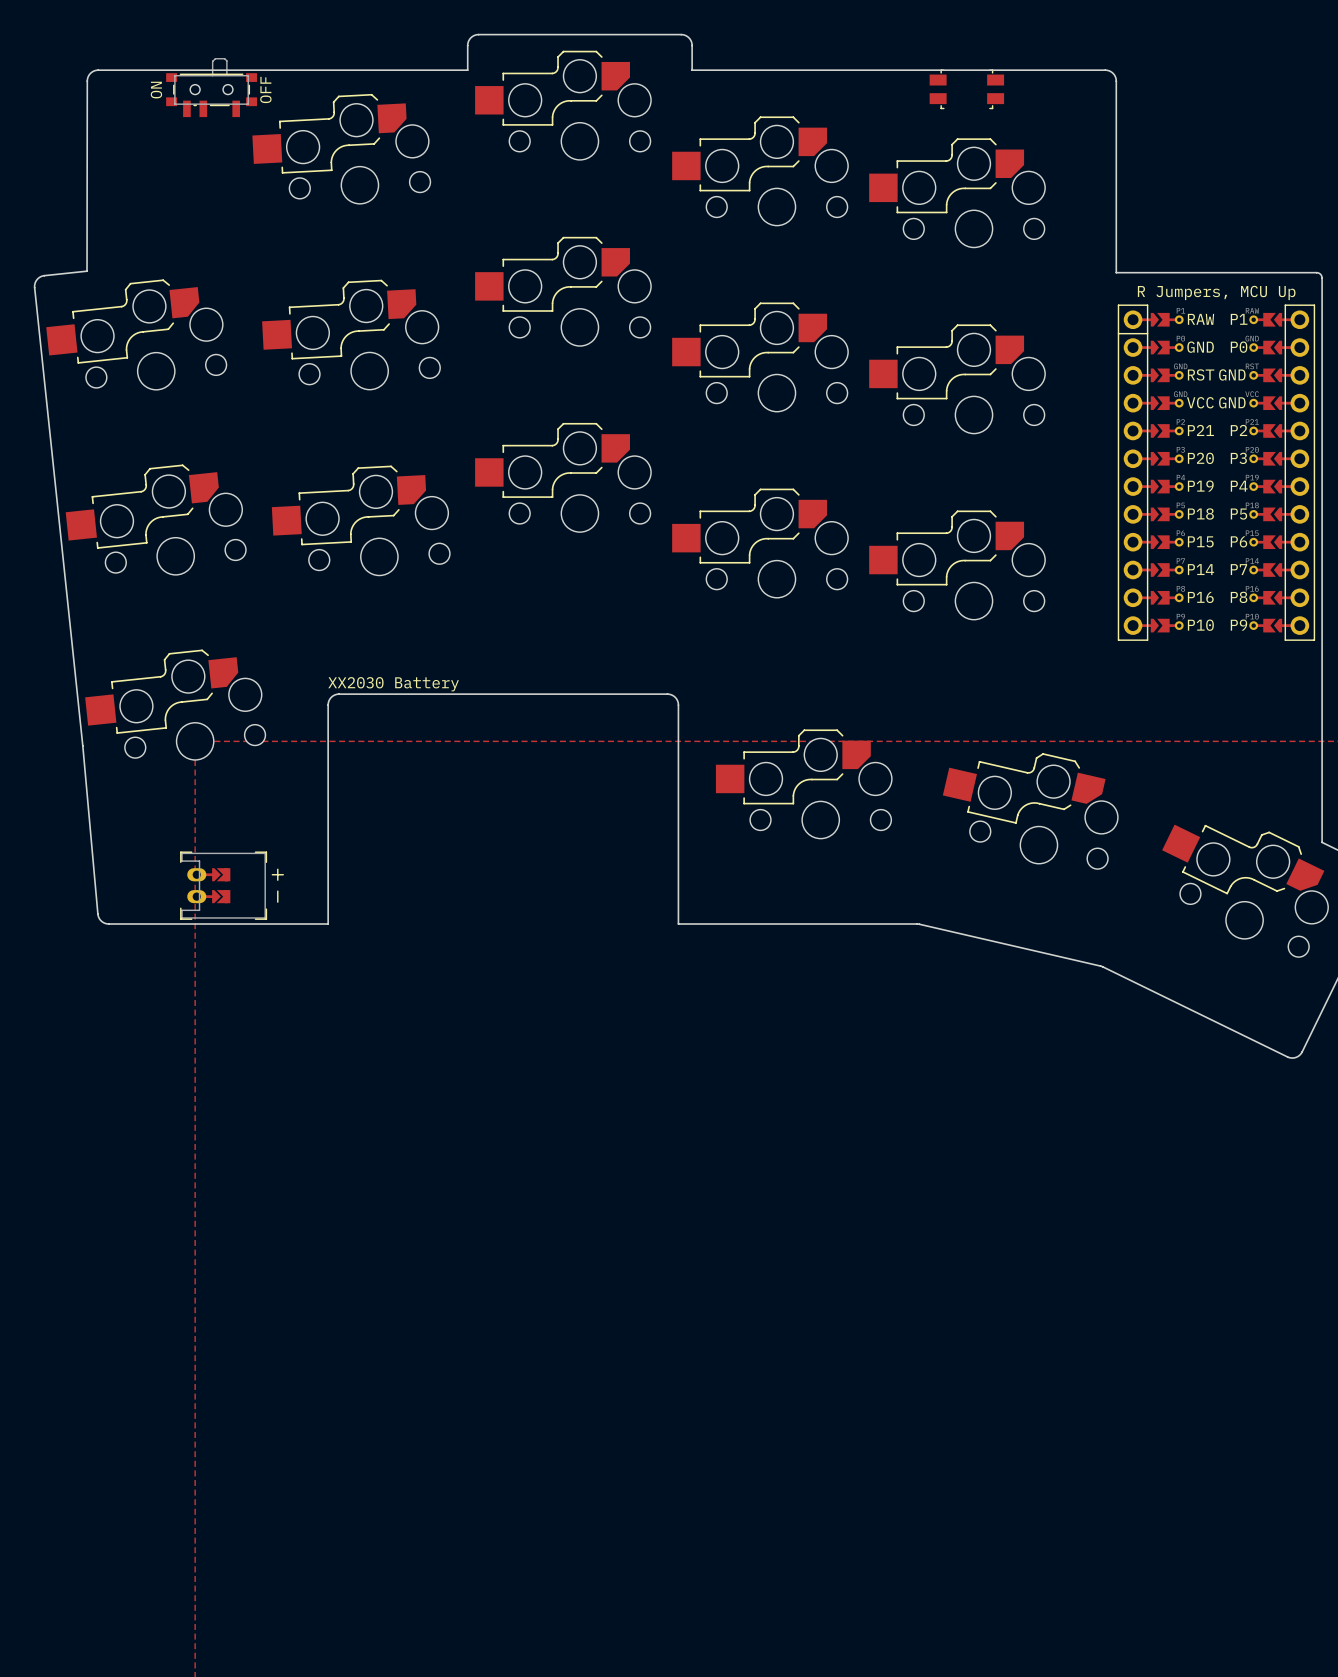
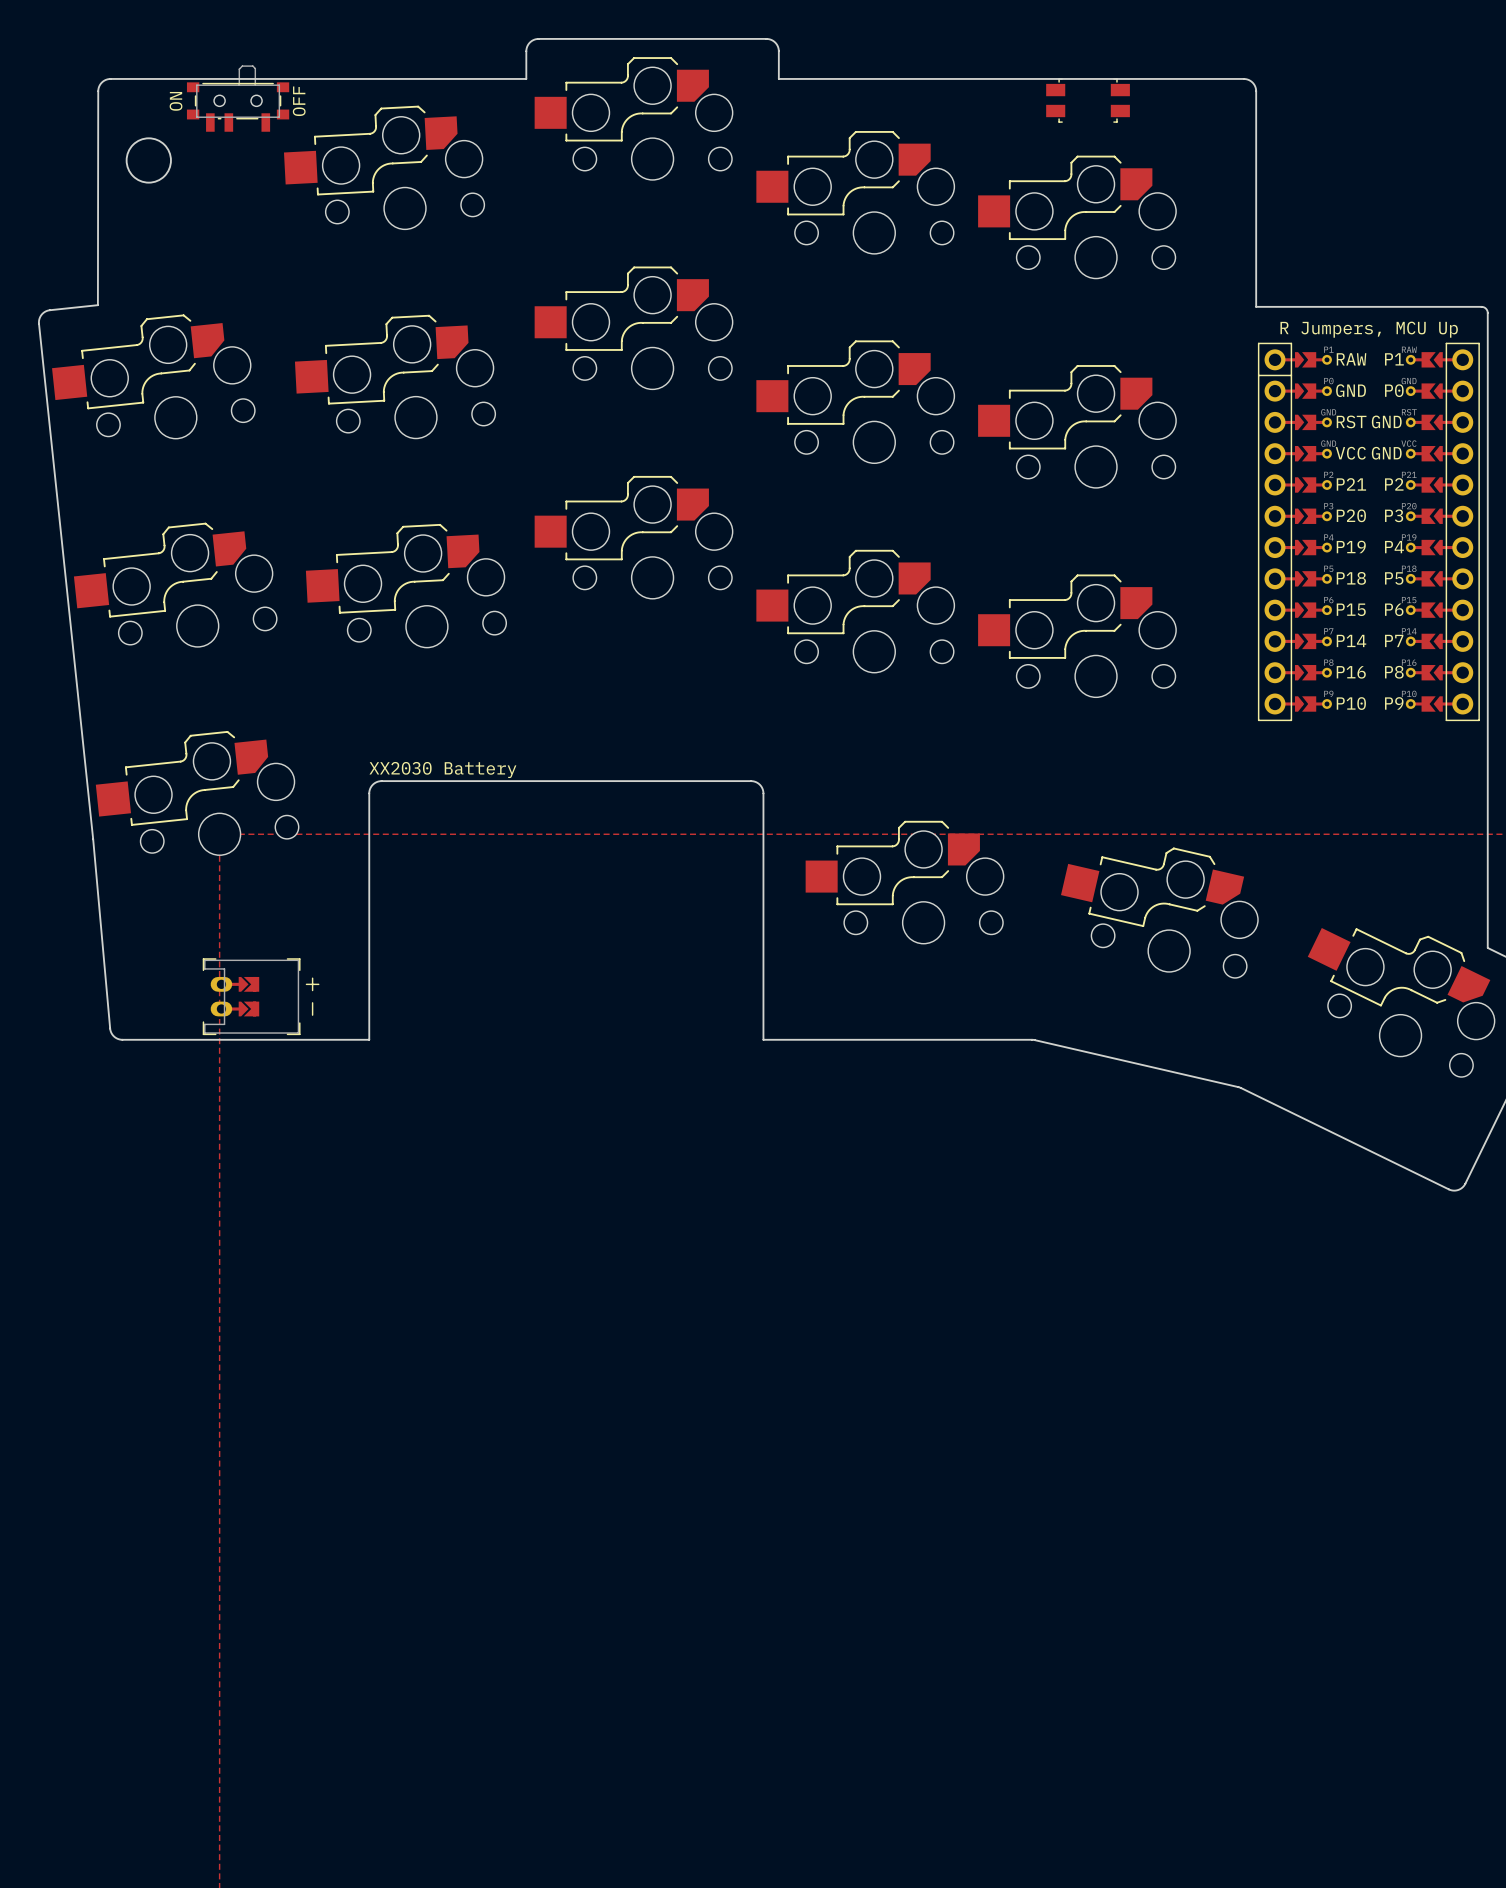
round board edge: none -> [125, 137, 172, 184]

